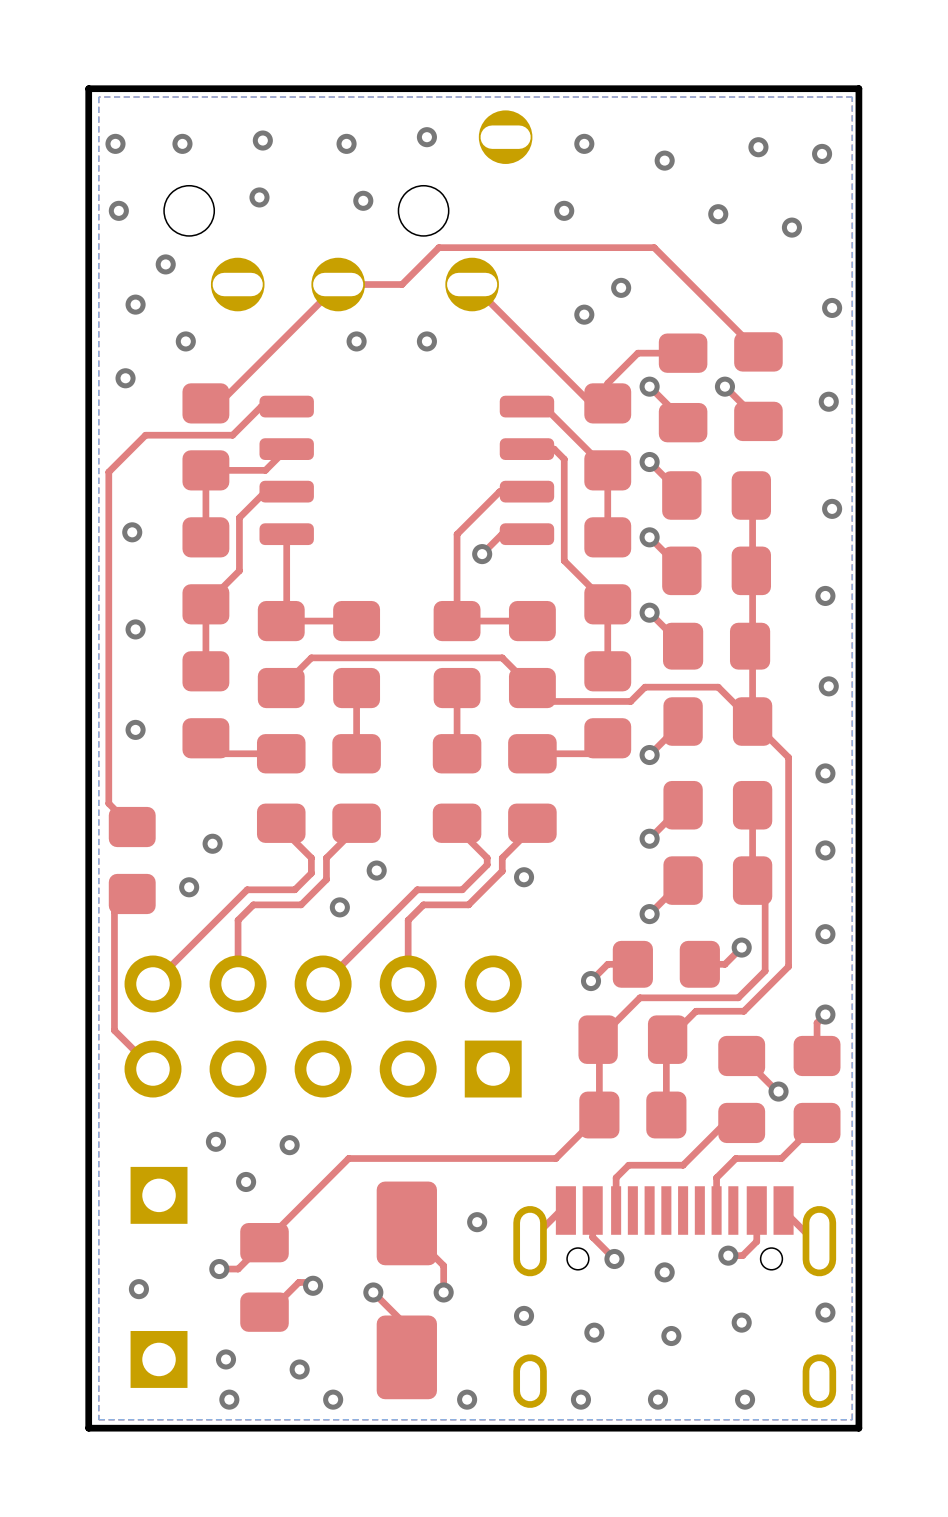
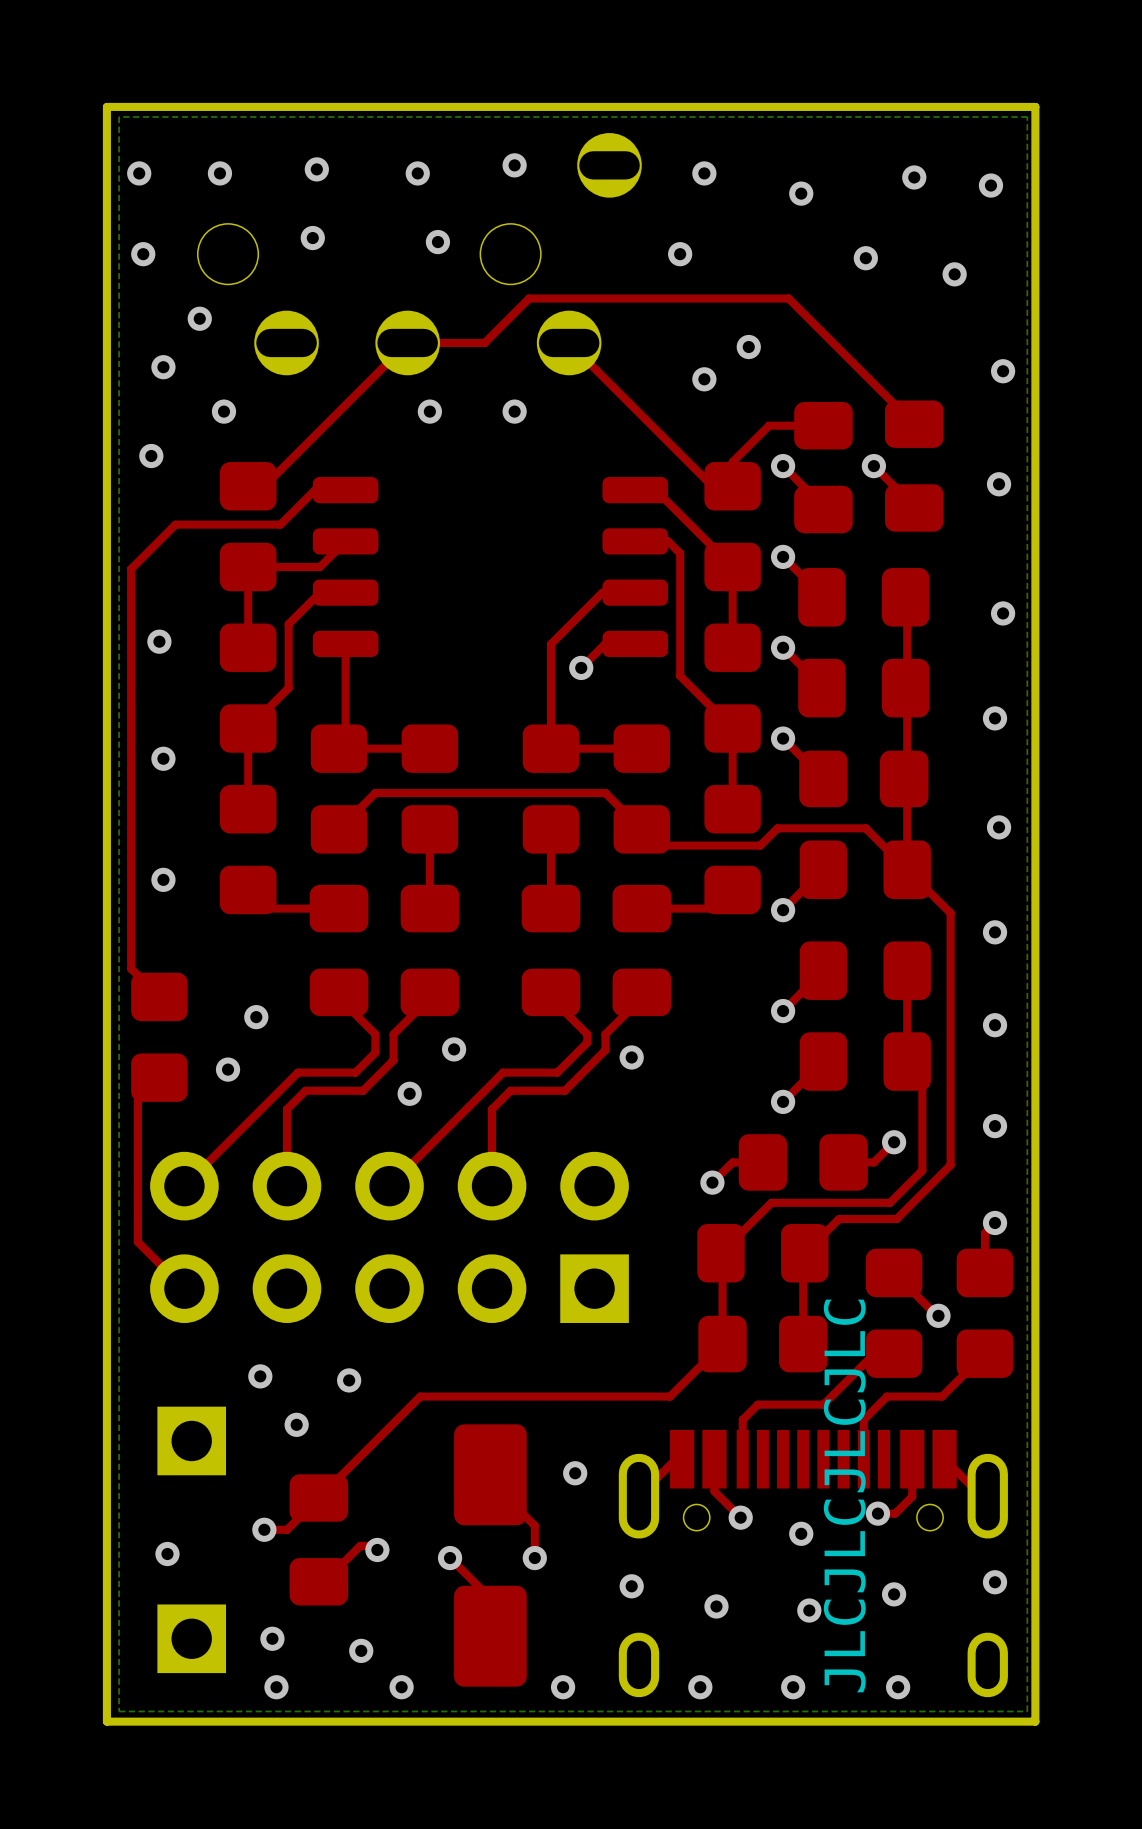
text: none -> JLCJLCJLCJLC (844, 1495)

